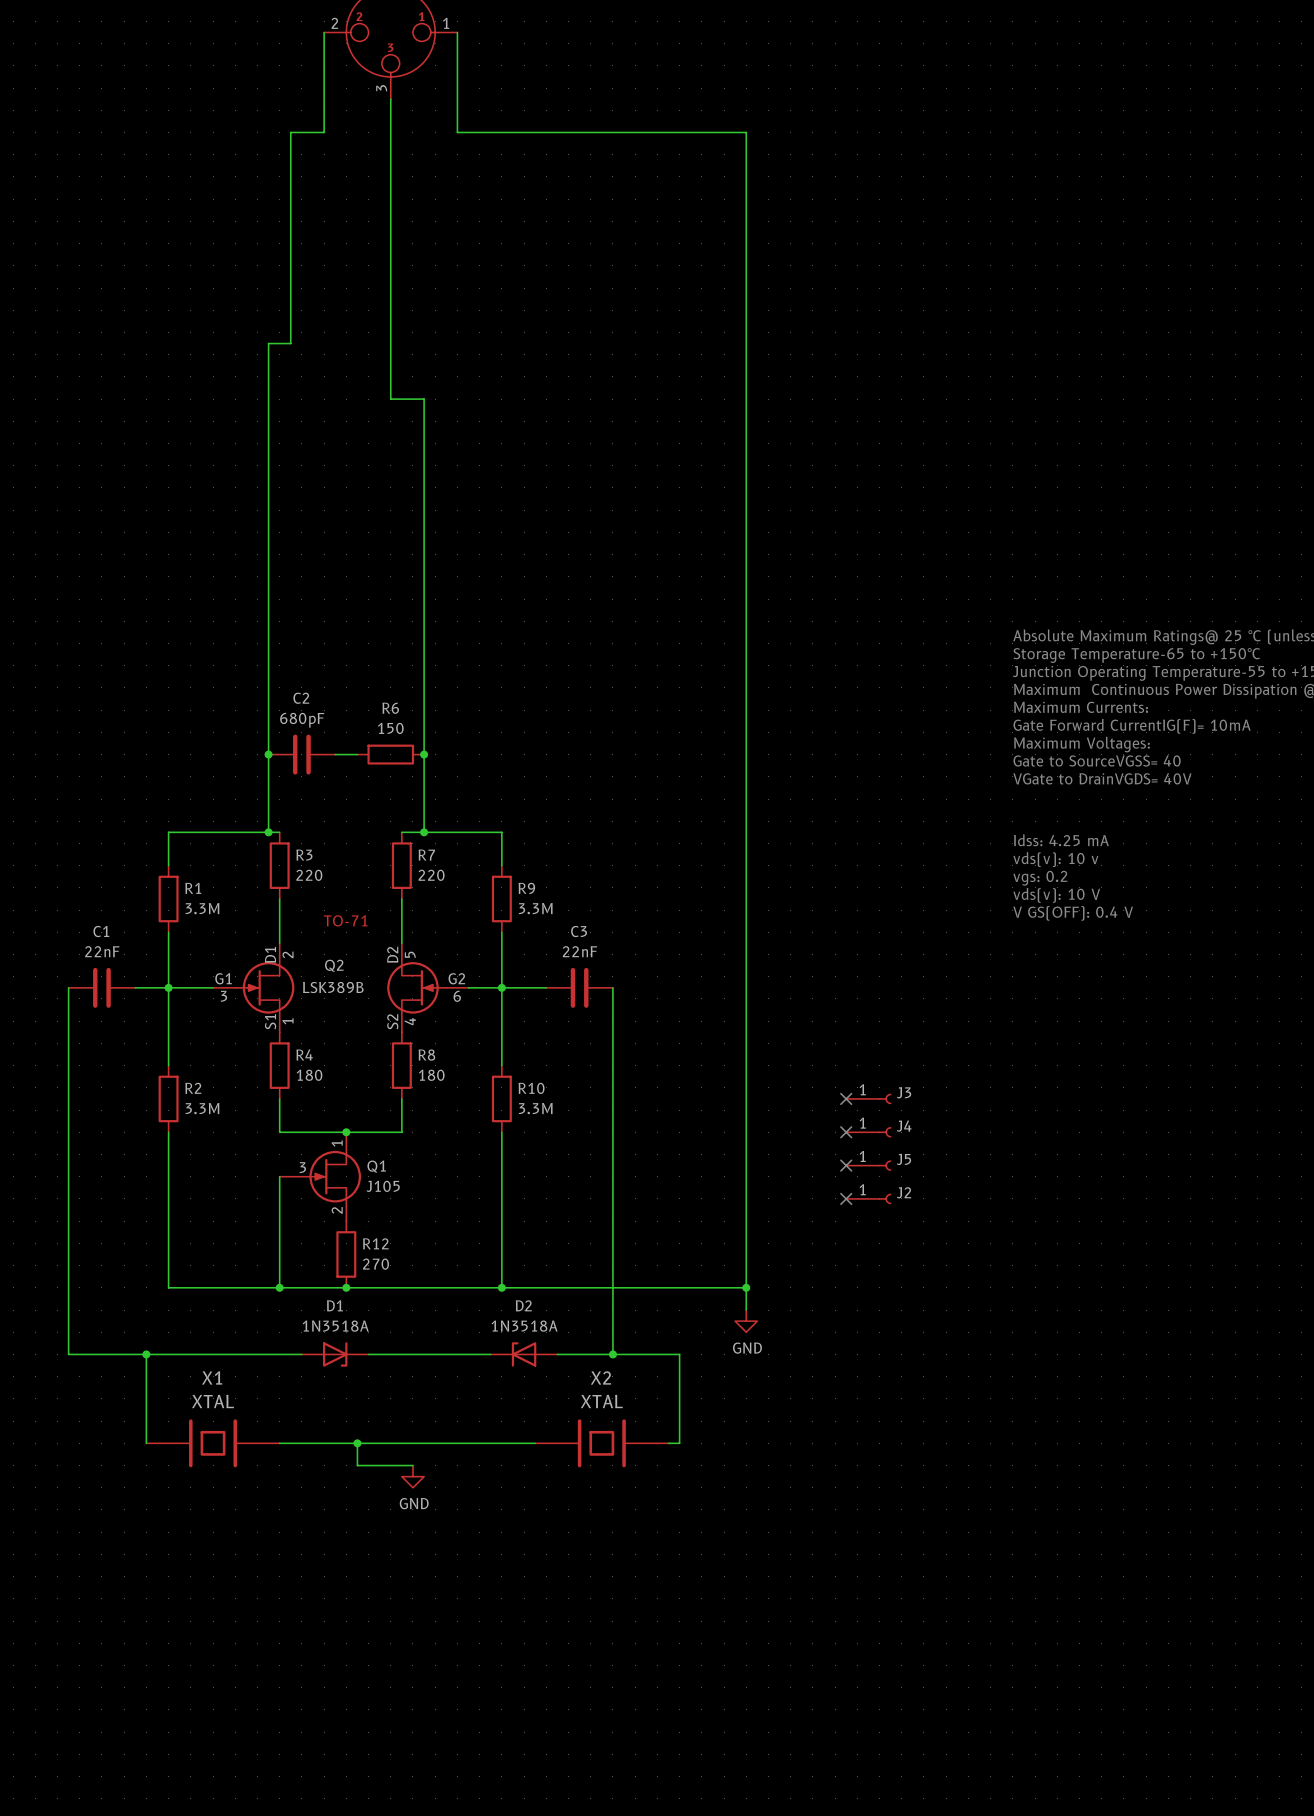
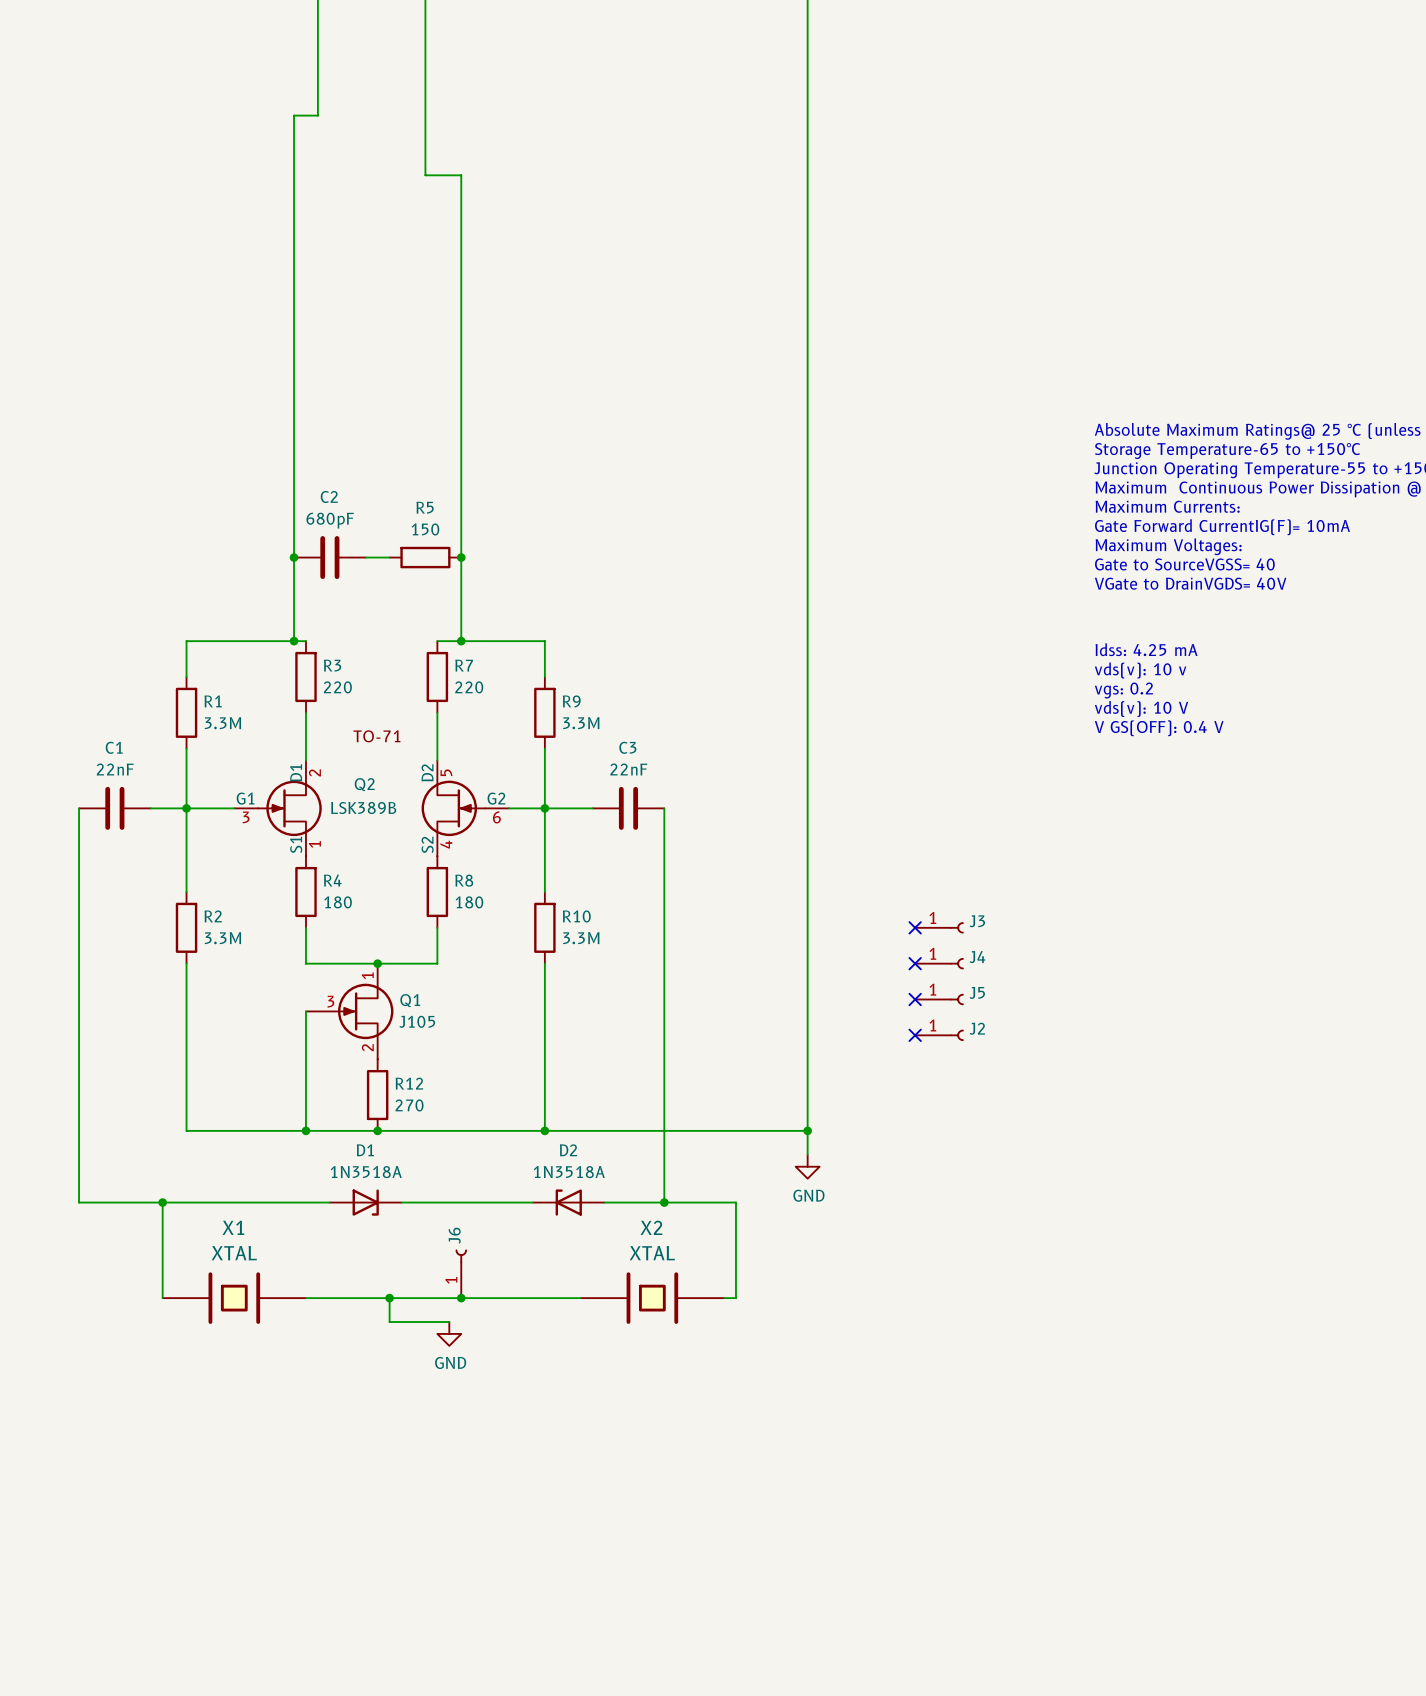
R6 name: R6 (390, 708) -> R5 (425, 507)
J6: none -> (461, 1273)
junction: none -> (461, 1298)

